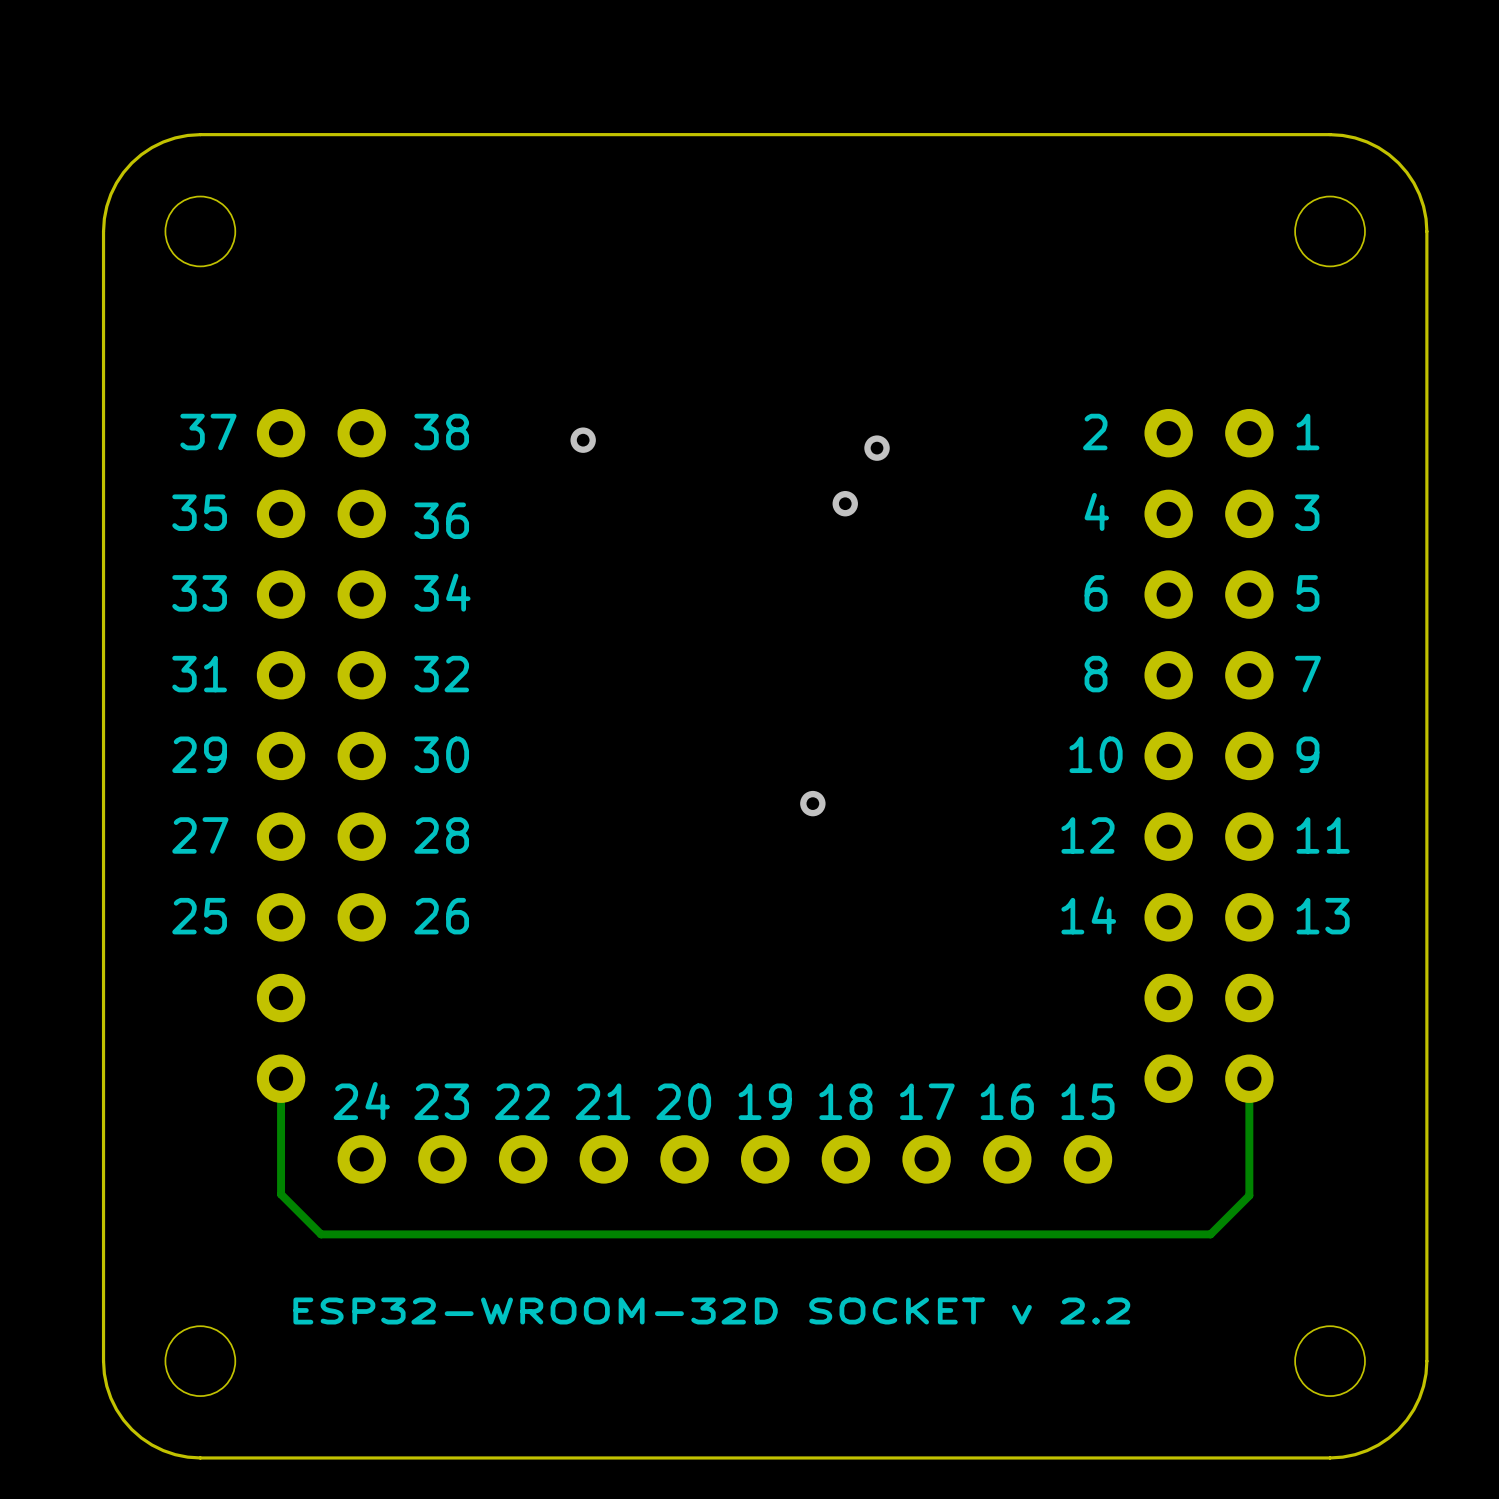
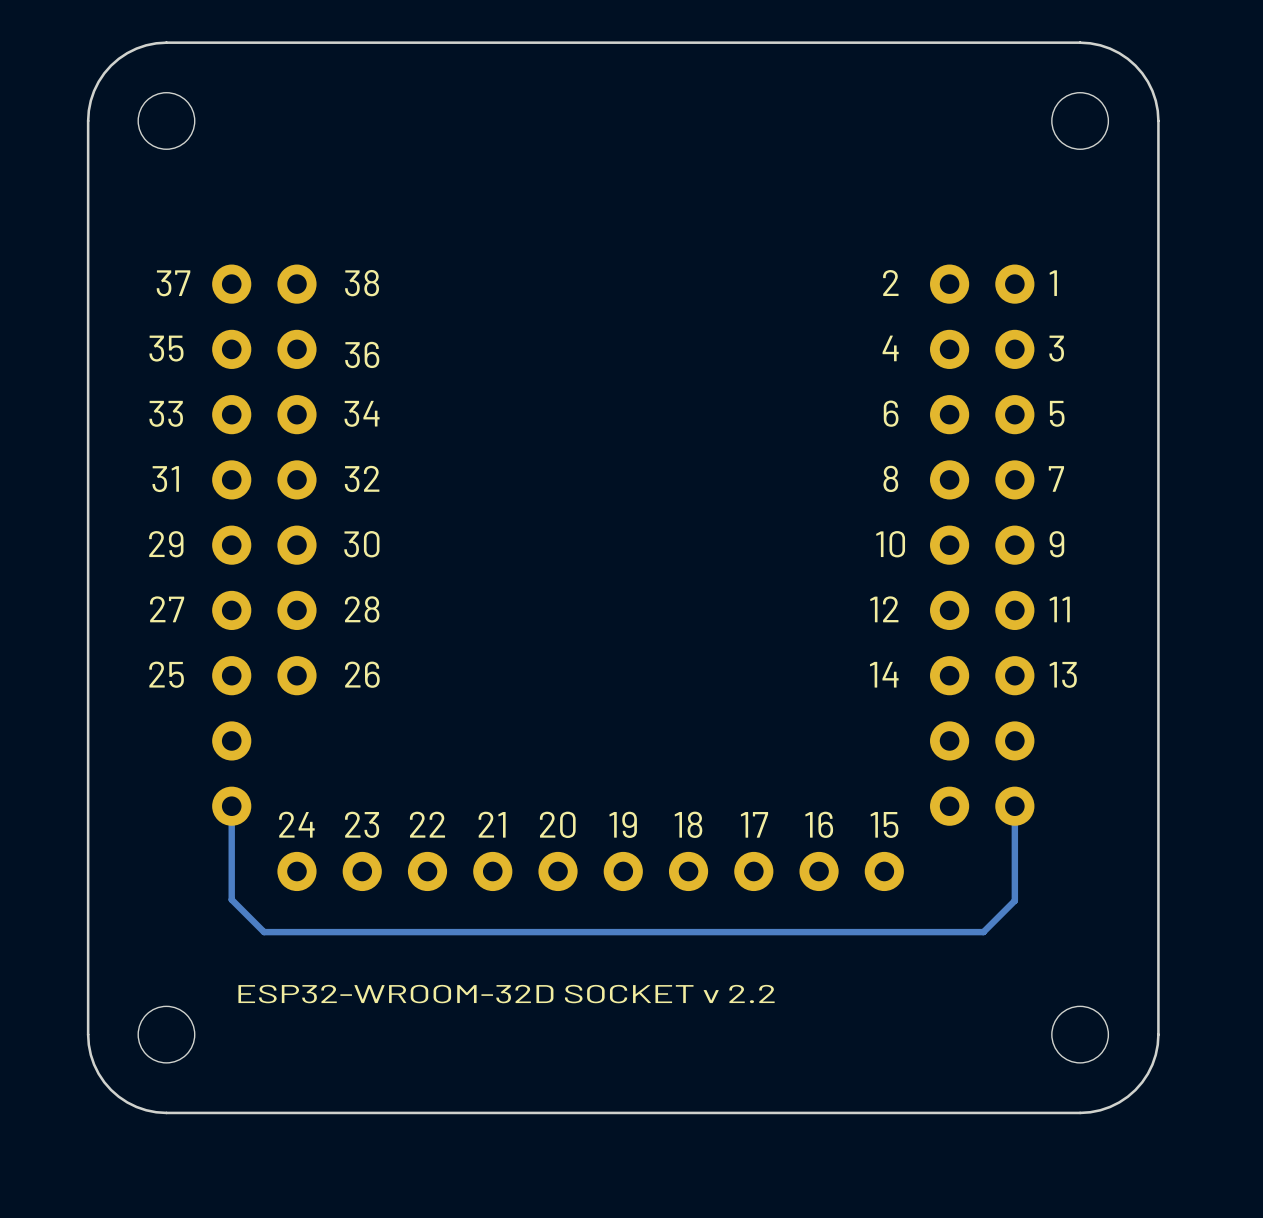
via: (583, 440) -> none
via: (877, 448) -> none
via: (845, 503) -> none
via: (812, 803) -> none

